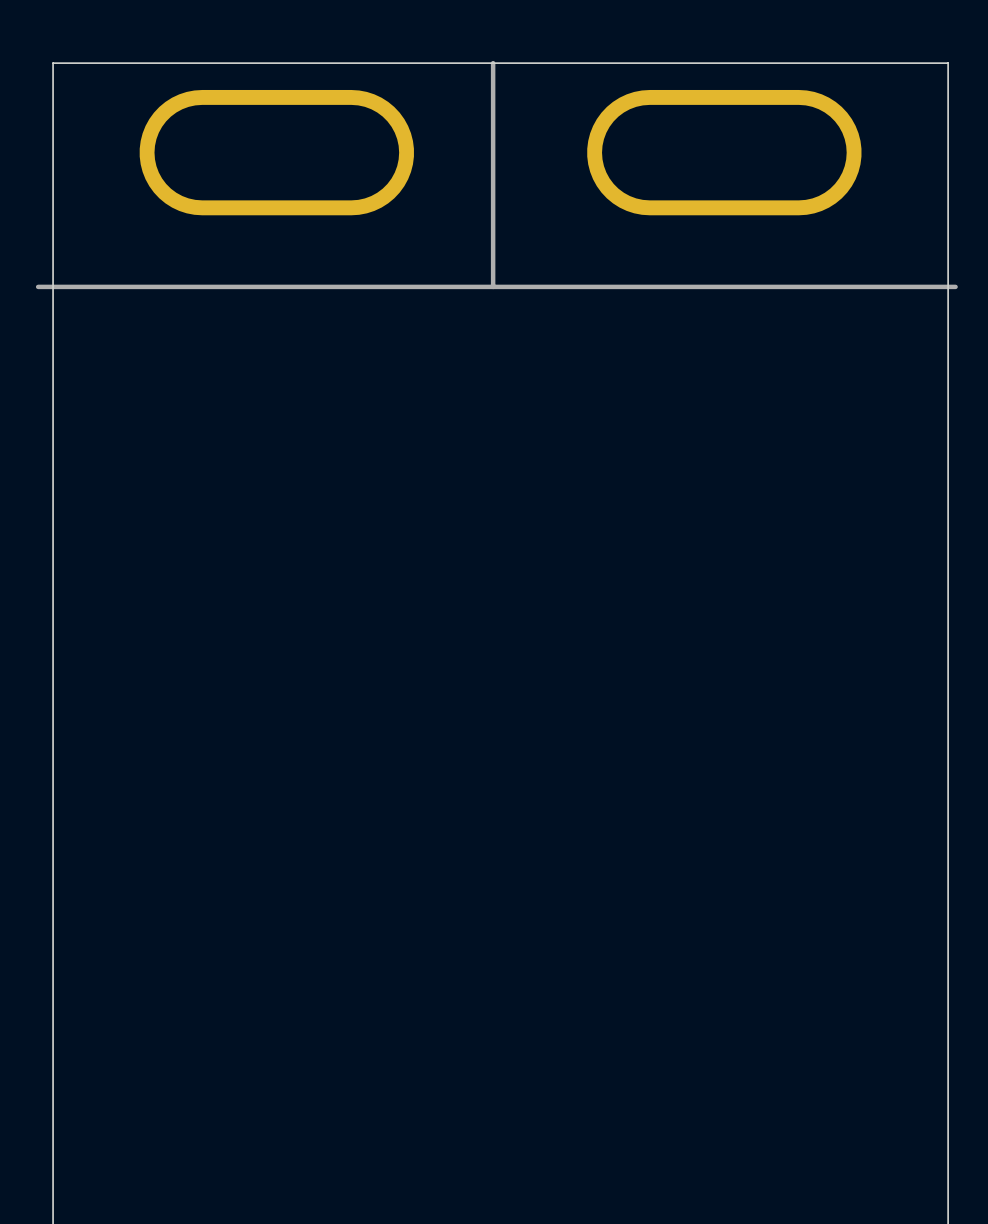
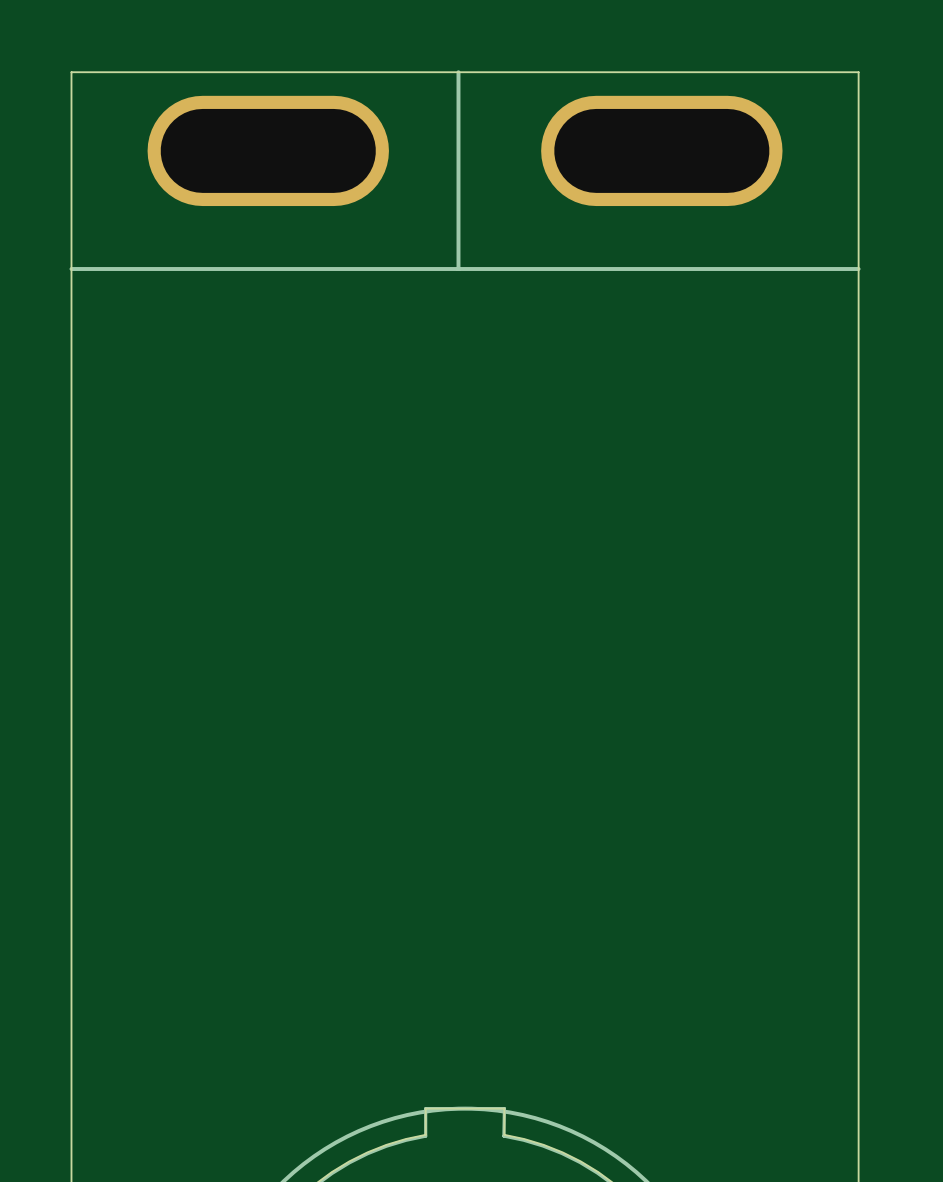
line: (38, 286) (53, 286) -> none
line: (948, 286) (955, 286) -> none

